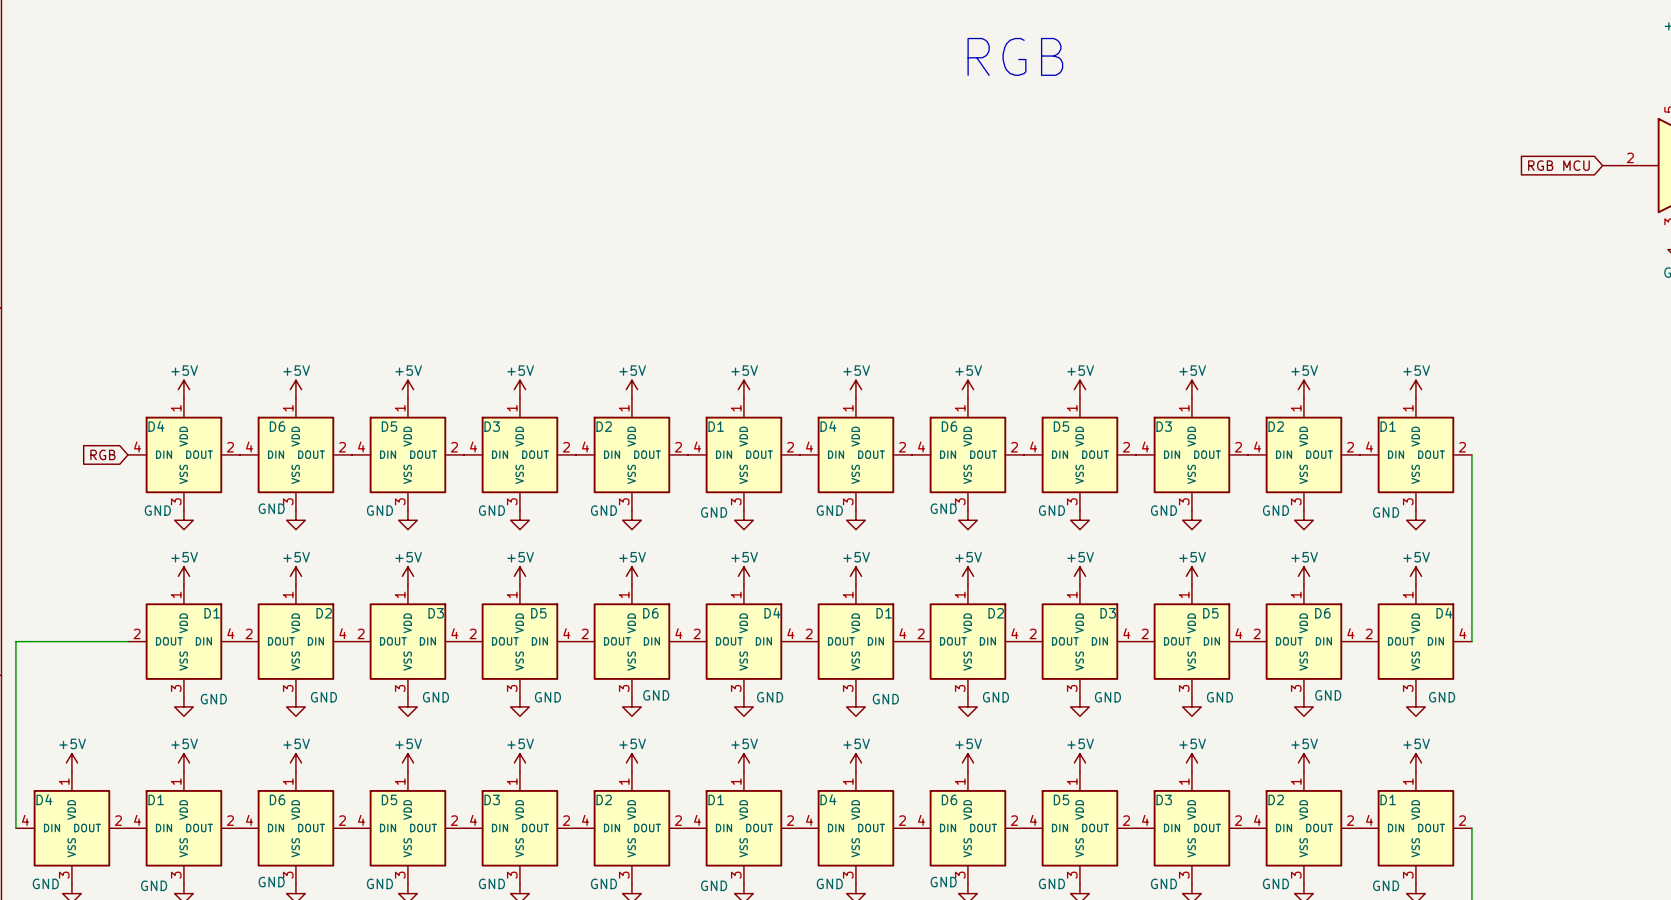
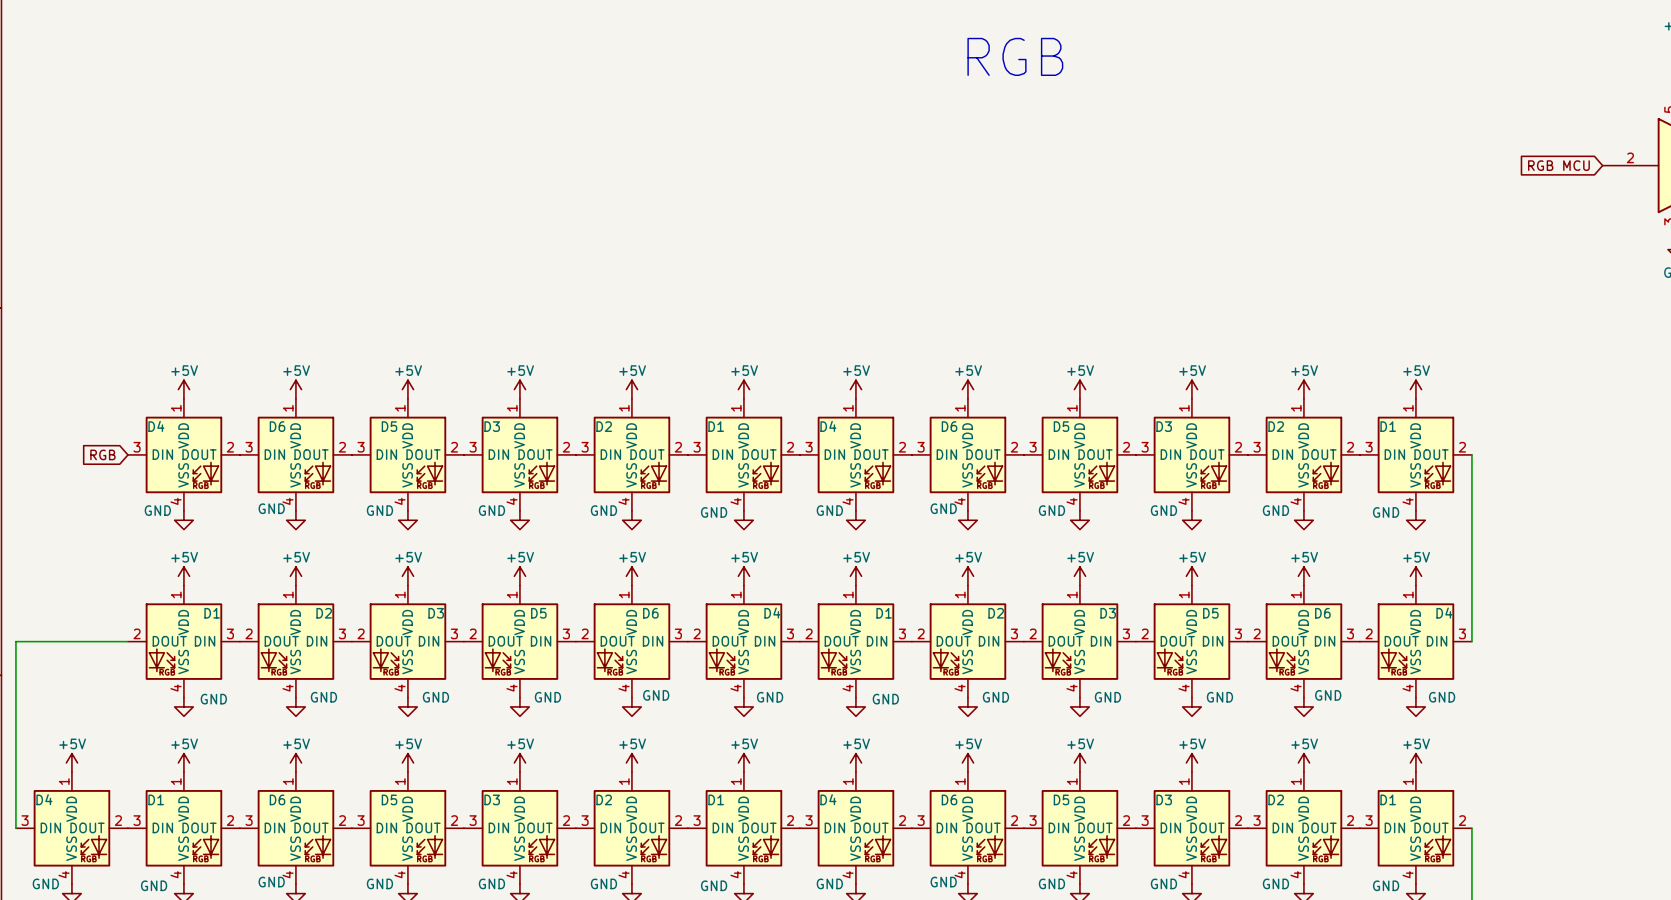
D4 symbol: [127, 398, 240, 511] -> [127, 398, 240, 511]
D6 symbol: [239, 398, 352, 511] -> [239, 398, 352, 511]
D5 symbol: [351, 398, 464, 511] -> [351, 398, 464, 511]
D3 symbol: [463, 398, 576, 511] -> [463, 398, 576, 511]
D2 symbol: [575, 398, 688, 511] -> [575, 398, 688, 511]
D1 symbol: [687, 398, 800, 511] -> [687, 398, 800, 511]
D4 symbol: [799, 398, 912, 511] -> [799, 398, 912, 511]
D6 symbol: [911, 398, 1024, 511] -> [911, 398, 1024, 511]
D5 symbol: [1023, 398, 1136, 511] -> [1023, 398, 1136, 511]
D3 symbol: [1135, 398, 1248, 511] -> [1135, 398, 1248, 511]
D2 symbol: [1247, 398, 1360, 511] -> [1247, 398, 1360, 511]
D1 symbol: [1359, 398, 1472, 511] -> [1359, 398, 1472, 511]
D1 symbol: [127, 585, 240, 698] -> [127, 585, 240, 698]
D2 symbol: [239, 585, 352, 698] -> [239, 585, 352, 698]
D3 symbol: [351, 585, 464, 698] -> [351, 585, 464, 698]
D5 symbol: [463, 585, 576, 698] -> [463, 585, 576, 698]
D6 symbol: [575, 585, 688, 698] -> [575, 585, 688, 698]
D4 symbol: [687, 585, 800, 698] -> [687, 585, 800, 698]
D1 symbol: [799, 585, 912, 698] -> [799, 585, 912, 698]
D2 symbol: [911, 585, 1024, 698] -> [911, 585, 1024, 698]
D3 symbol: [1023, 585, 1136, 698] -> [1023, 585, 1136, 698]
D5 symbol: [1135, 585, 1248, 698] -> [1135, 585, 1248, 698]
D6 symbol: [1247, 585, 1360, 698] -> [1247, 585, 1360, 698]
D4 symbol: [1359, 585, 1472, 698] -> [1359, 585, 1472, 698]
D4 symbol: [15, 772, 128, 885] -> [15, 772, 128, 885]
D1 symbol: [127, 772, 240, 885] -> [127, 772, 240, 885]
D6 symbol: [239, 772, 352, 885] -> [239, 772, 352, 885]
D5 symbol: [351, 772, 464, 885] -> [351, 772, 464, 885]
D3 symbol: [463, 772, 576, 885] -> [463, 772, 576, 885]
D2 symbol: [575, 772, 688, 885] -> [575, 772, 688, 885]
D1 symbol: [687, 772, 800, 885] -> [687, 772, 800, 885]
D4 symbol: [799, 772, 912, 885] -> [799, 772, 912, 885]
D6 symbol: [911, 772, 1024, 885] -> [911, 772, 1024, 885]
D5 symbol: [1023, 772, 1136, 885] -> [1023, 772, 1136, 885]
D3 symbol: [1135, 772, 1248, 885] -> [1135, 772, 1248, 885]
D2 symbol: [1247, 772, 1360, 885] -> [1247, 772, 1360, 885]
D1 symbol: [1359, 772, 1472, 885] -> [1359, 772, 1472, 885]

